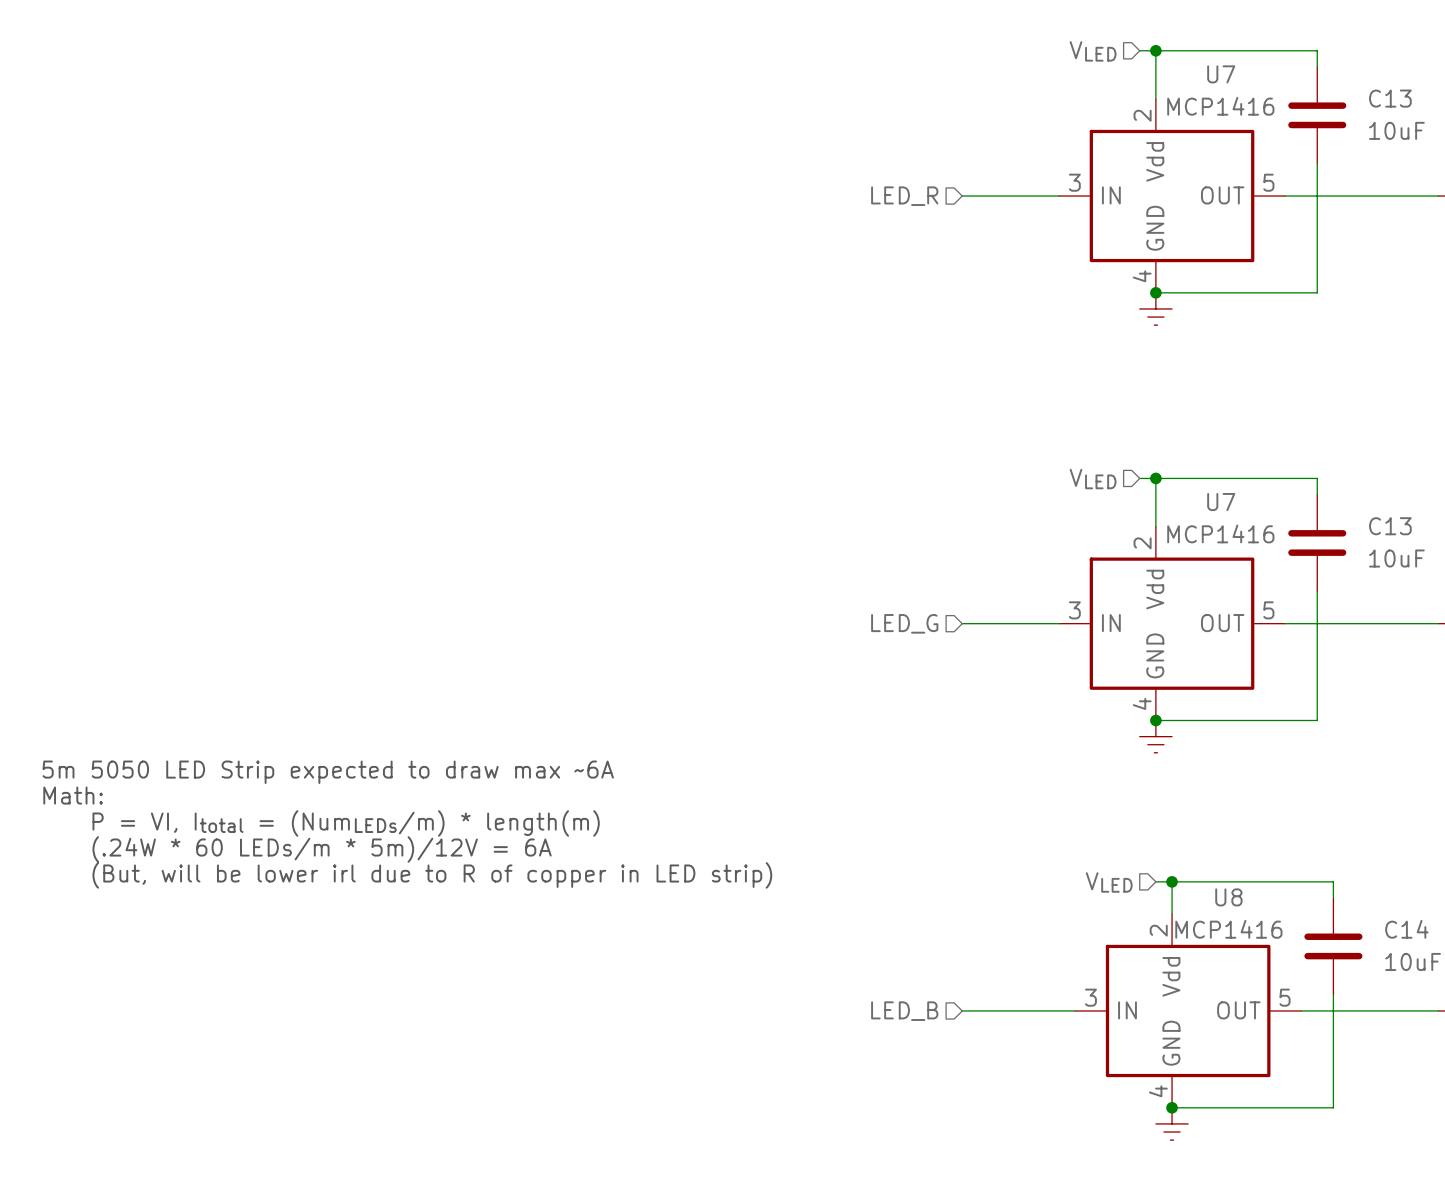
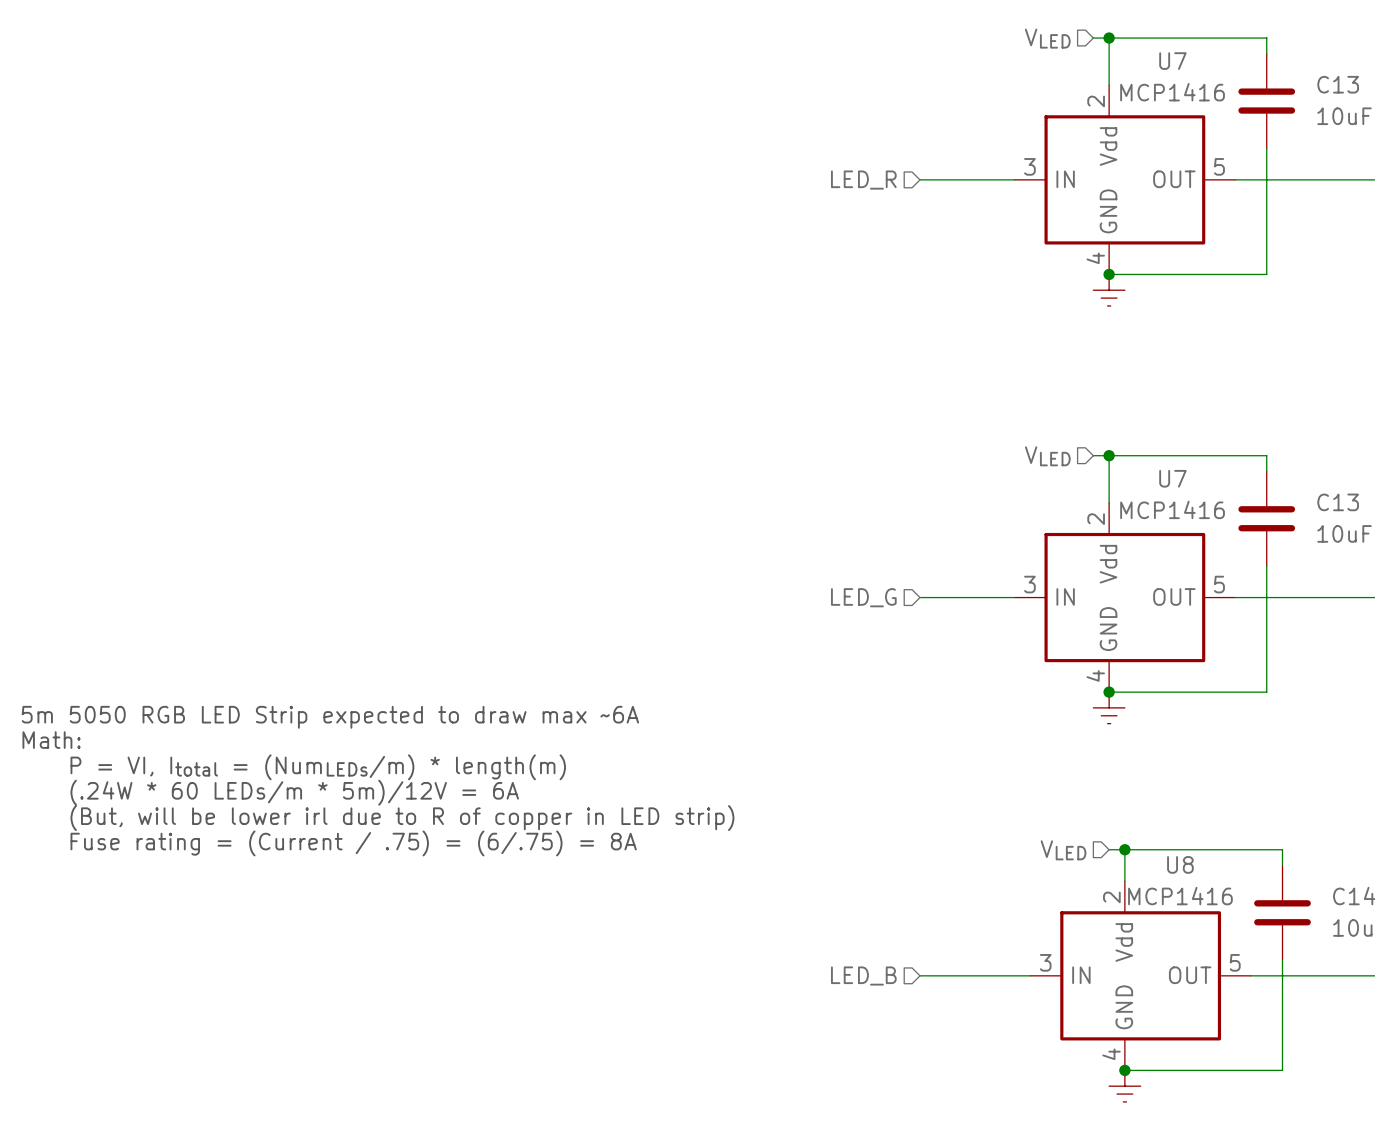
text: none -> 5m 5050 RGB LED Strip expected to draw max ~6A (330, 717)
text: 5m 5050 LED Strip expected to draw max ~6A (328, 772) -> Math: (51, 740)
text: Math: (73, 795) -> P = VI, Itotal = (NumLEDs/m) * length(m) (318, 767)
text: P = VI, Itotal = (NumLEDs/m) * length(m) (346, 823) -> (.24W * 60 LEDs/m * 5m)/12V = 6A (294, 792)
text: (.24W * 60 LEDs/m * 5m)/12V = 6A (322, 849) -> (But, will be lower irl due to R of copper in LED strip) (402, 818)
text: (But, will be lower irl due to R of copper in LED strip) (432, 875) -> Fuse rating = (Current / .75) = (6/.75) = 8A (353, 843)

